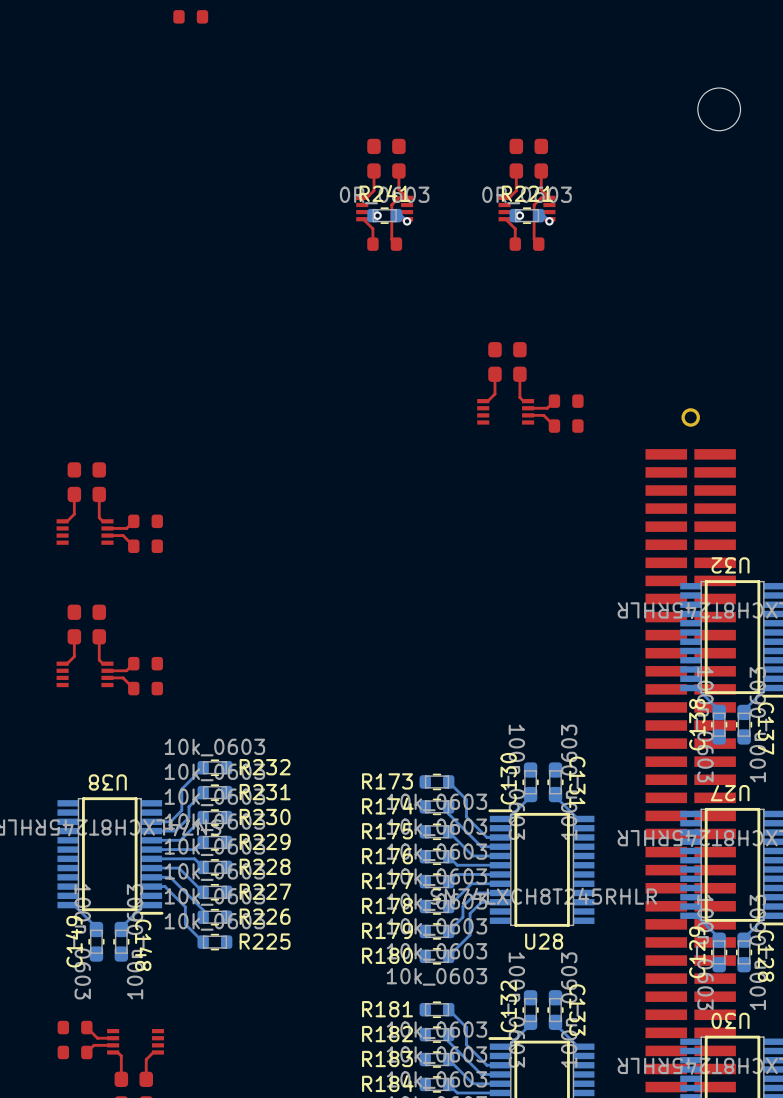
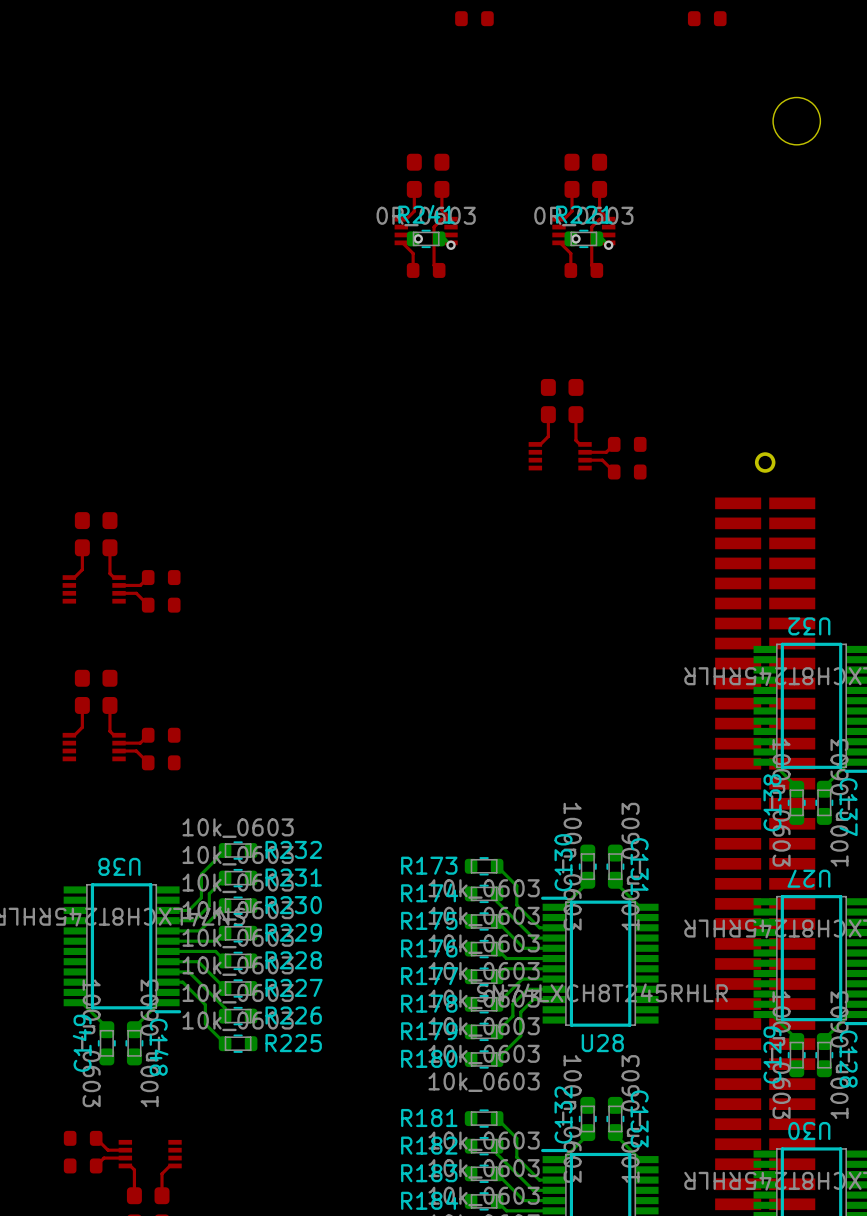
part: (190, 16) -> none
part: none -> (474, 18)
part: none -> (707, 18)

